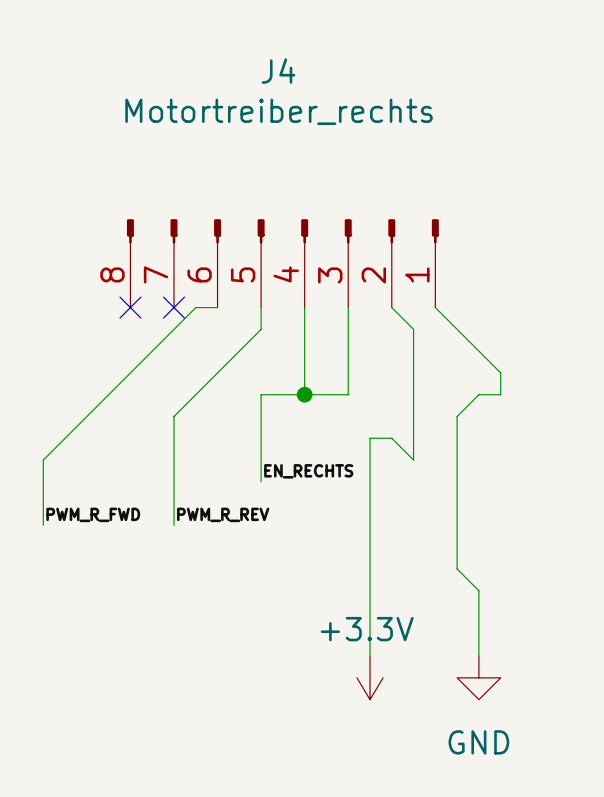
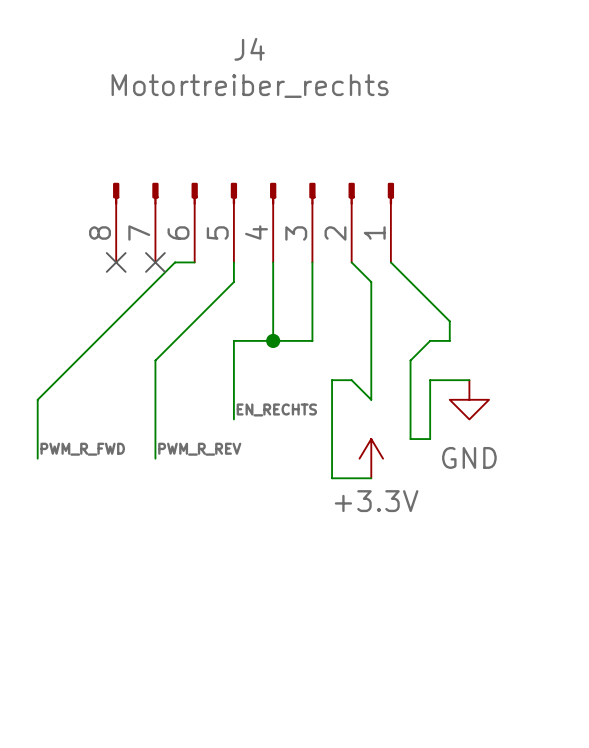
wire: (457, 503) (457, 568) (478, 590) (478, 656) -> (410, 439) (430, 439) (430, 380) (469, 380)
wire: (370, 547) (370, 656) -> (332, 478) (371, 478)
power symbol rotation: 0° (370, 677) -> 180° (371, 458)
power symbol position: +3.3V (370, 677) -> +3.3V (371, 458)
power symbol position: GND (478, 677) -> GND (469, 399)

